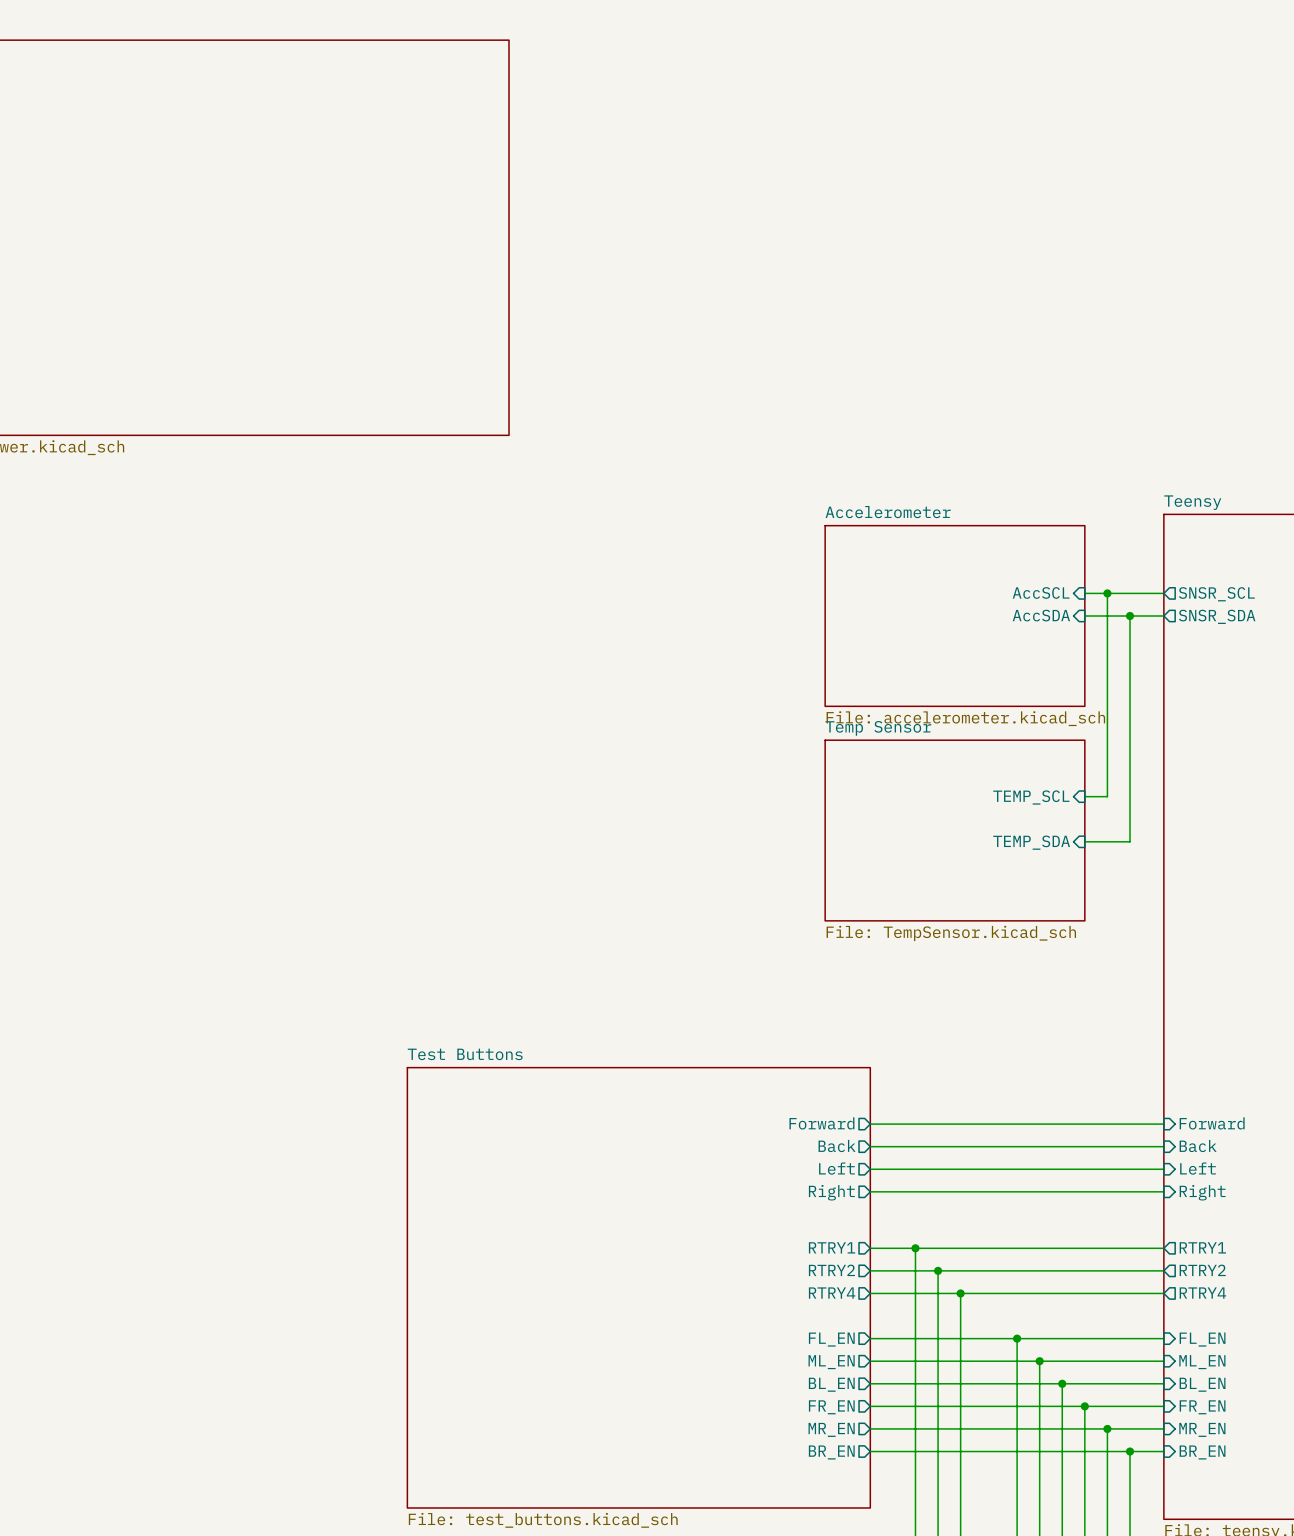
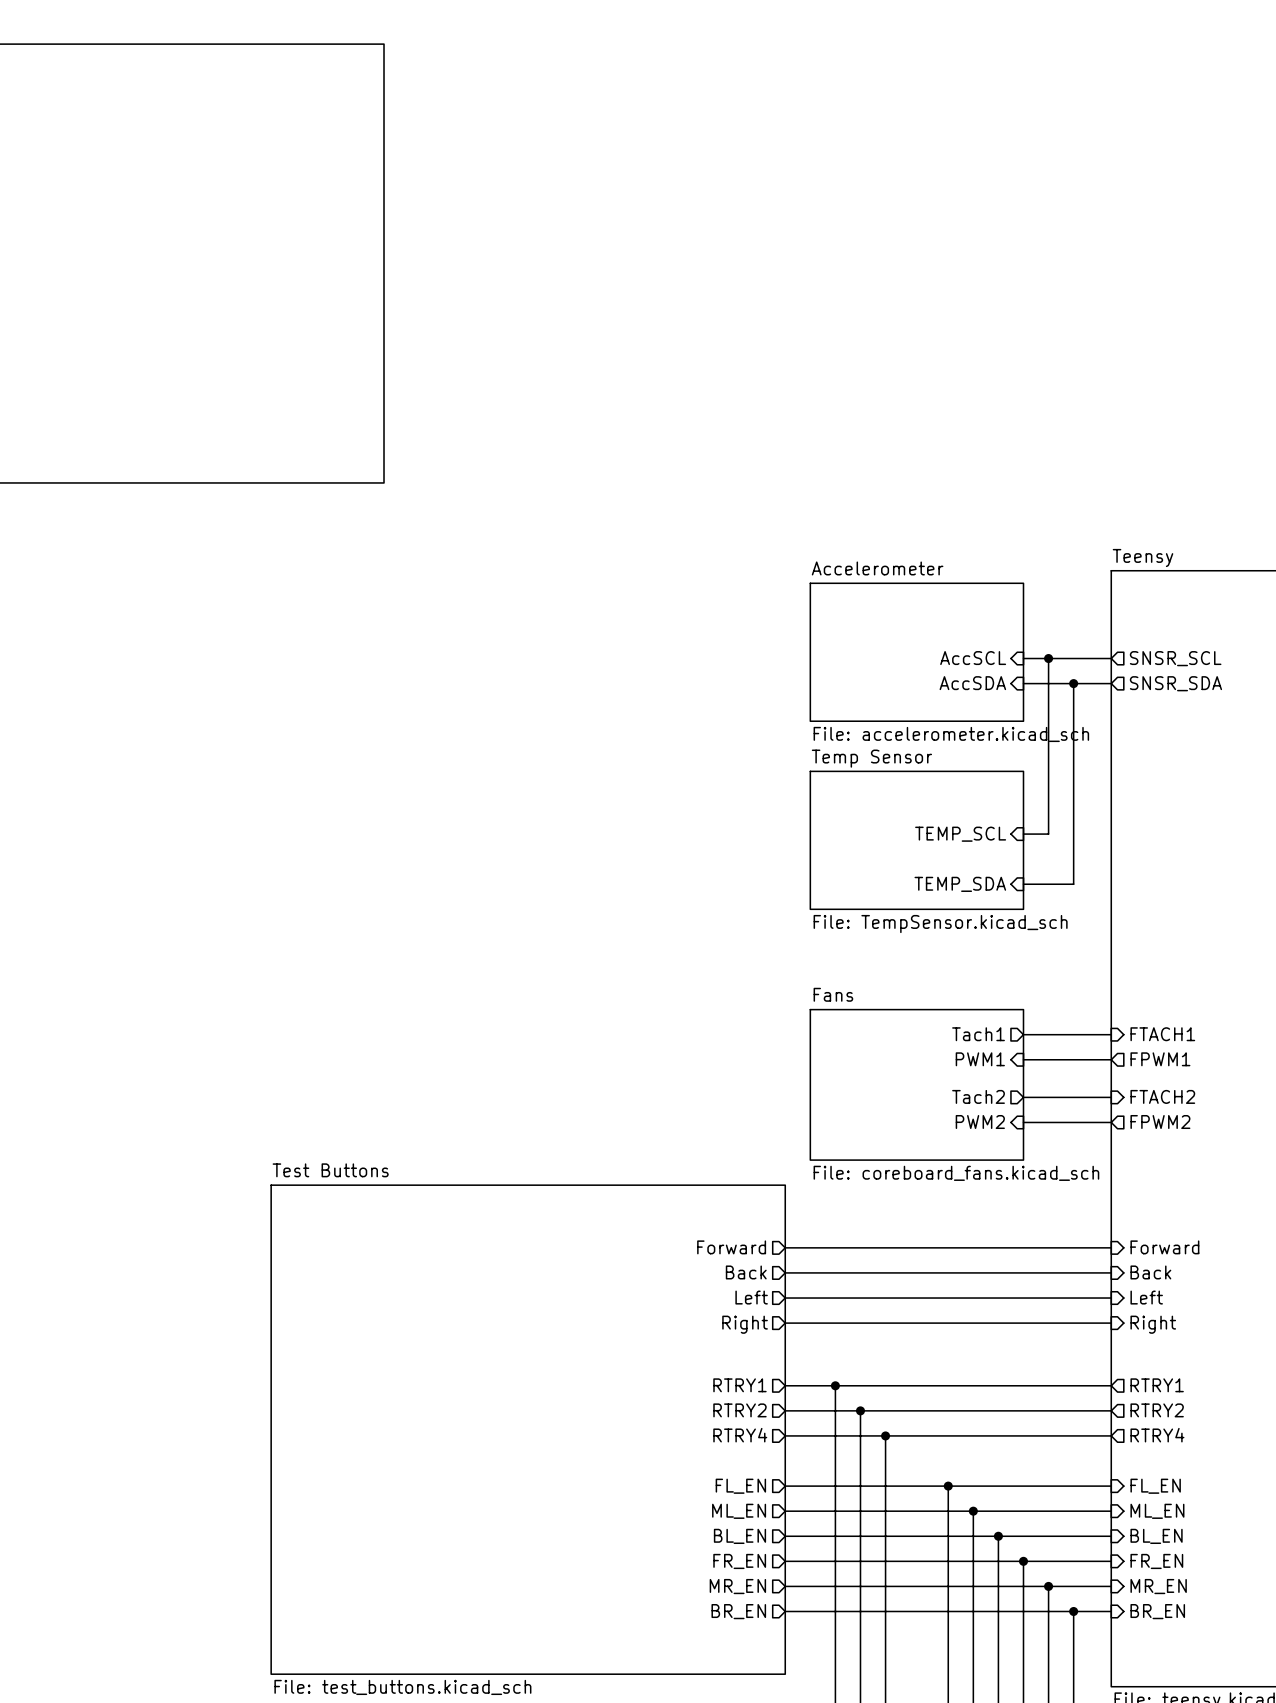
sheet Accelerometer: none -> File: accelerometer.kicad_sch (916, 652)
sheet Accelerometer: File: accelerometer.kicad_sch (954, 615) -> none
wire: none -> (1023, 834) (1048, 834)
wire: (1107, 751) (1107, 796) -> (1073, 884) (1048, 884)
sheet pin: none -> TEMP_SCL (960, 834)
sheet Temp Sensor: none -> File: TempSensor.kicad_sch (916, 840)
wire: (1130, 796) (1130, 841) (1084, 841) -> none
sheet pin: TEMP_SCL (1031, 797) -> TEMP_SDA (960, 884)
sheet Temp Sensor: File: TempSensor.kicad_sch (954, 830) -> none
sheet pin: TEMP_SDA (1031, 842) -> none
sheet pin: none -> Tach1 (978, 1034)
sheet pin: none -> FTACH1 (1162, 1034)
wire: none -> (1023, 1034) (1111, 1034)
sheet pin: none -> PWM1 (980, 1059)
wire: none -> (1023, 1059) (1111, 1059)
sheet pin: none -> FPWM1 (1160, 1059)
sheet Fans: none -> File: coreboard_fans.kicad_sch (916, 1084)
sheet pin: none -> Tach2 (978, 1096)
wire: none -> (1023, 1097) (1111, 1097)
sheet pin: none -> FTACH2 (1162, 1096)
sheet pin: none -> PWM2 (980, 1122)
sheet pin: none -> FPWM2 (1160, 1122)
wire: none -> (1023, 1122) (1111, 1122)

